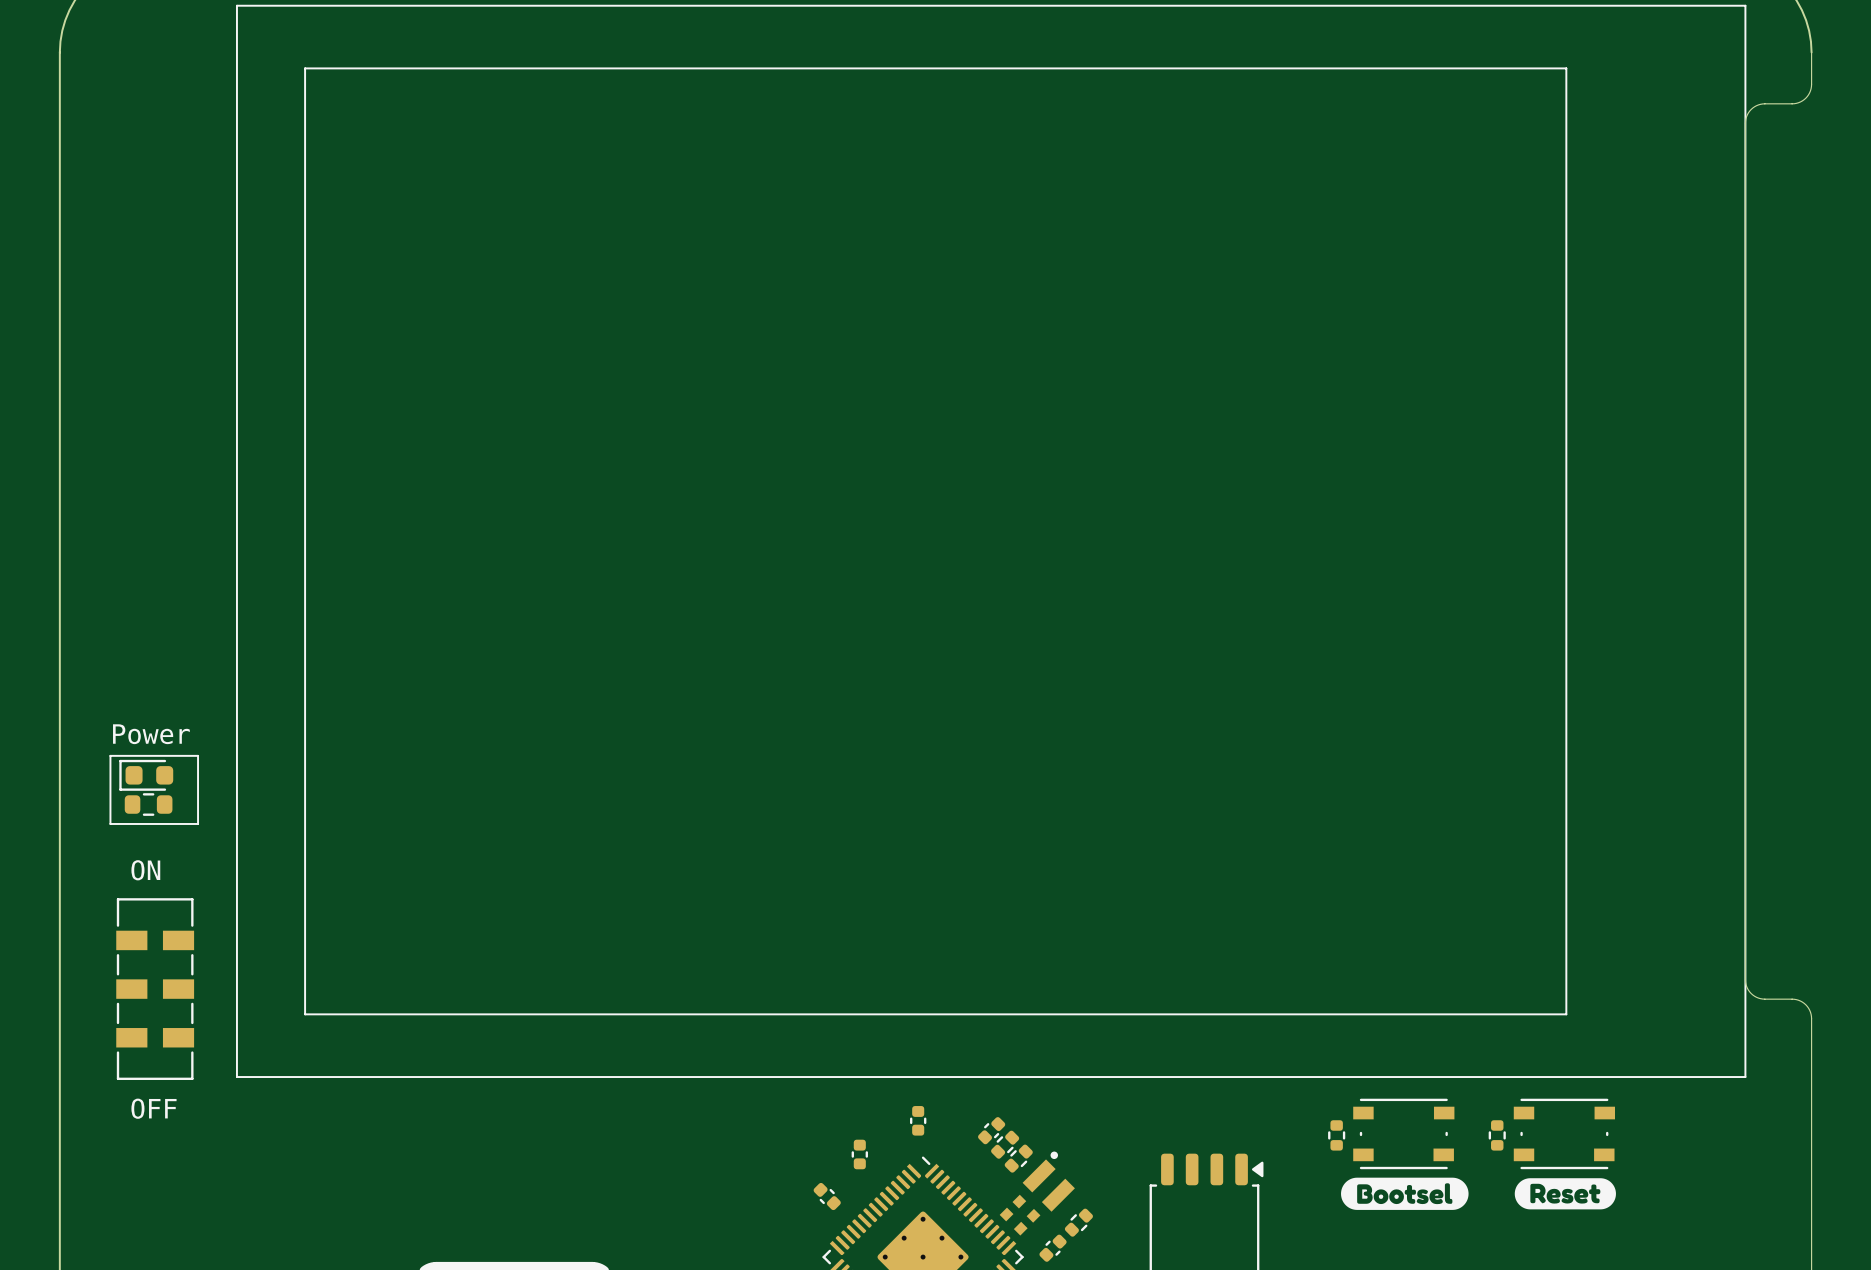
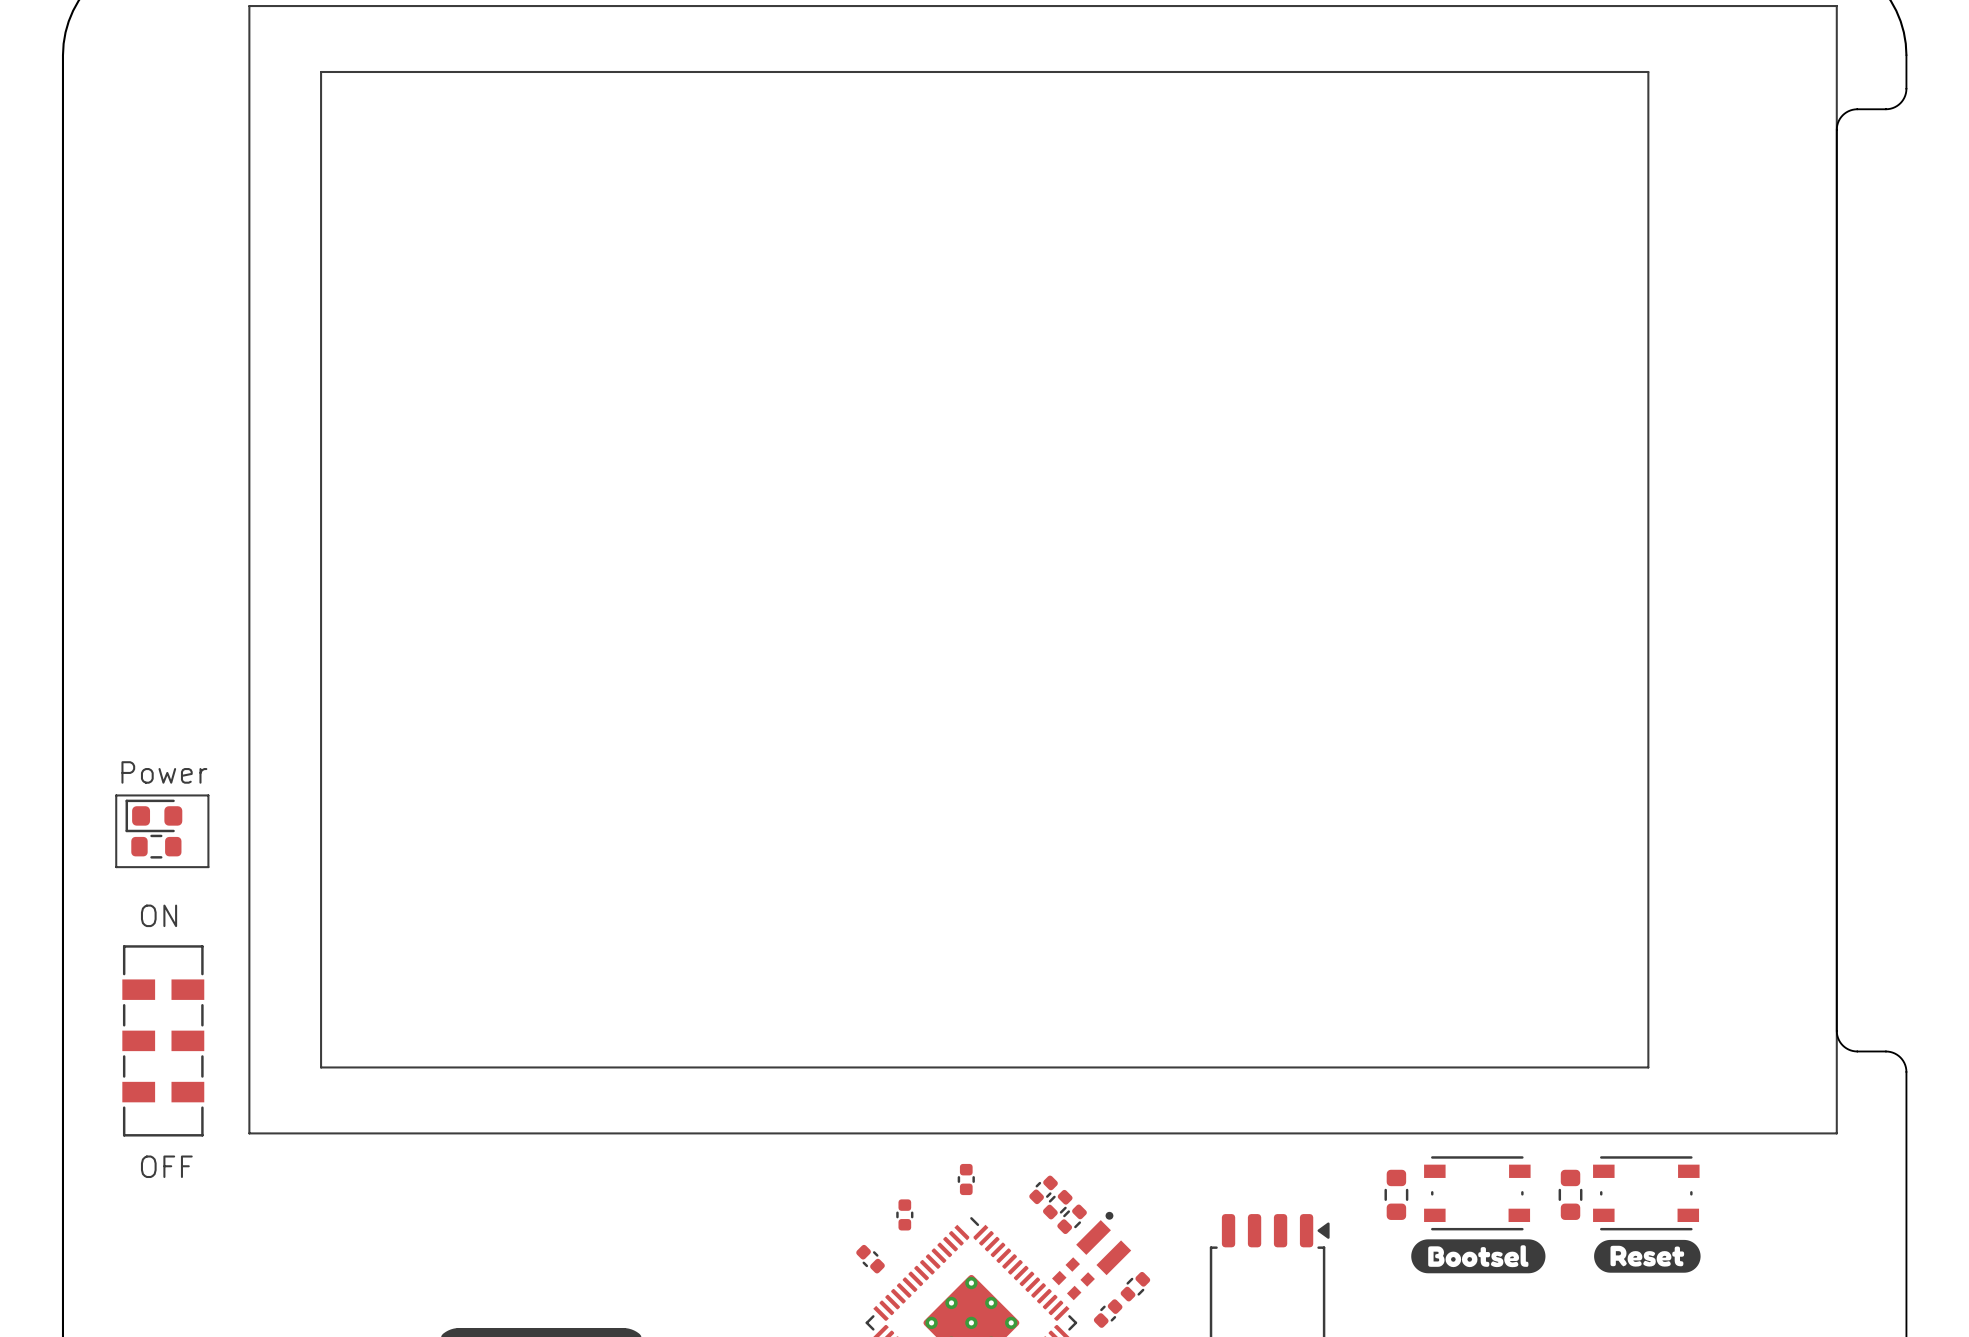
part footprint: [1328, 1120, 1346, 1151] -> [1384, 1169, 1409, 1220]
part footprint: [1488, 1120, 1506, 1151] -> [1558, 1169, 1583, 1220]

